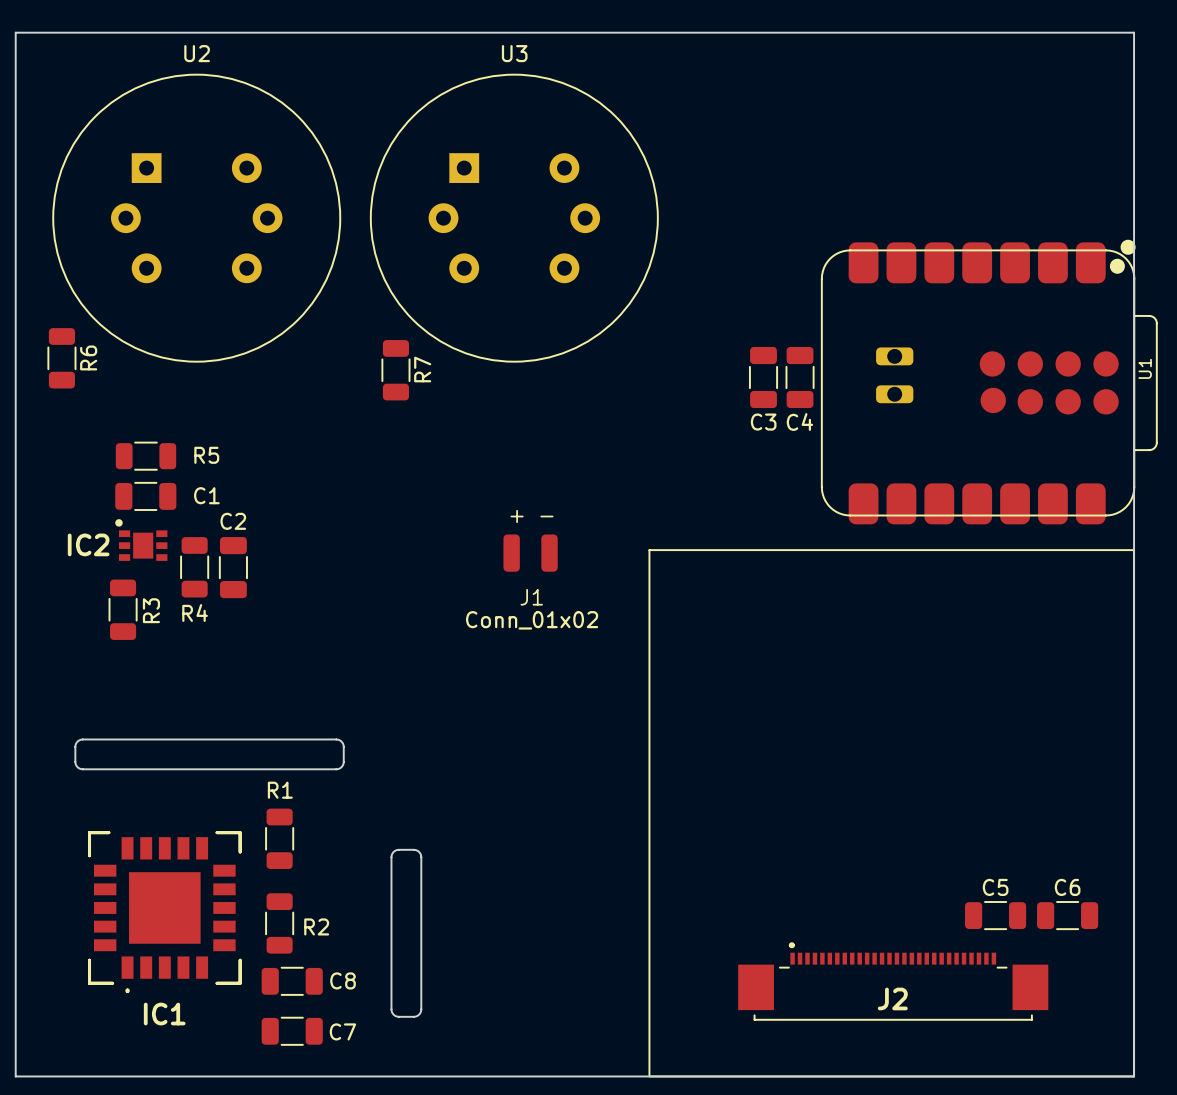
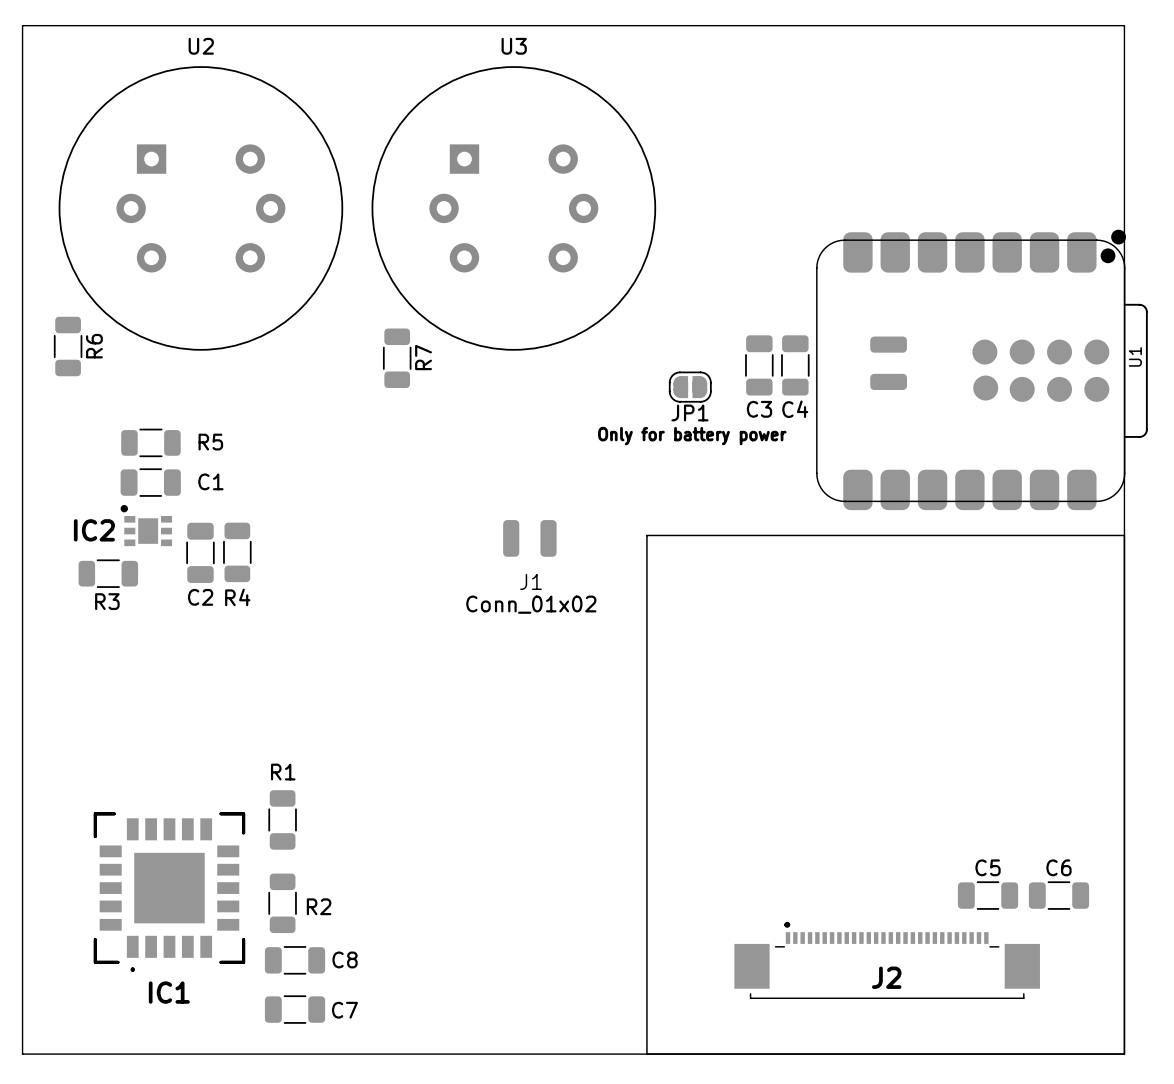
U1 footprint: [821, 239, 1158, 525] -> [816, 229, 1148, 511]
JP1: none -> (690, 387)
text: none -> Only for battery power (692, 436)
text: + - (532, 516) -> none
C2 name position: C2 (233, 521) -> C2 (200, 597)
R4 position: (194, 567) -> (237, 552)
C2 position: (233, 567) -> (200, 552)
R3 rotation: 0° (123, 609) -> 90° clockwise (108, 573)
board edge: (82, 739) (337, 739) (343, 745) (343, 762) (340, 767) (336, 769) (81, 769) (75, 763) (75, 746) (77, 741) (82, 739) -> none
board edge: (398, 849) (415, 850) (421, 856) (421, 1009) (419, 1013) (414, 1016) (397, 1016) (391, 1010) (391, 857) (393, 852) (398, 849) -> none

